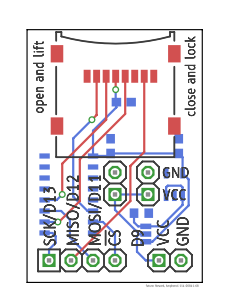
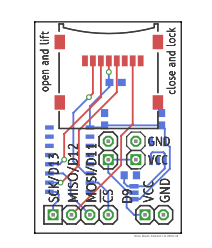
line: (142, 183) (136, 177) (136, 166) (142, 161) (153, 161) (158, 166) (158, 177) (153, 183) (158, 188) (158, 199) (153, 205) (150, 205) -> none

